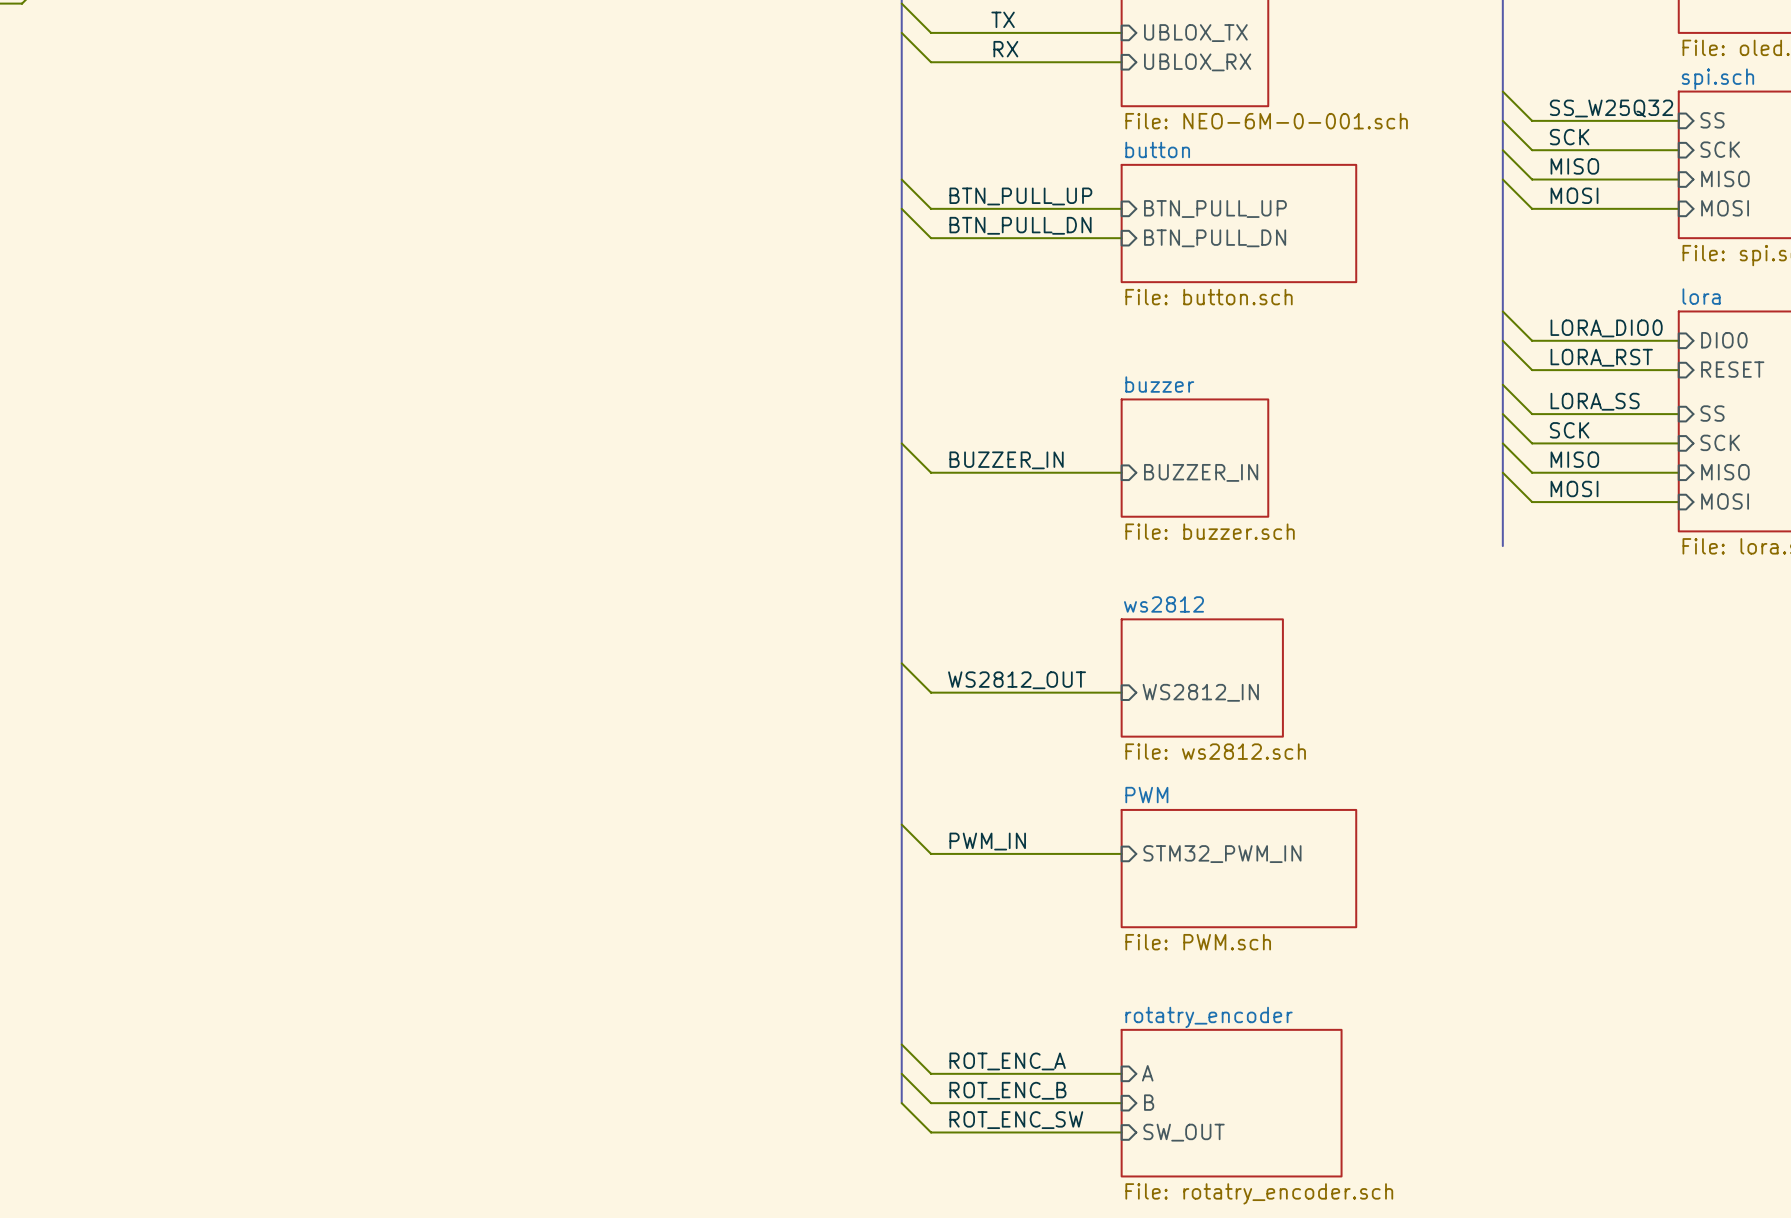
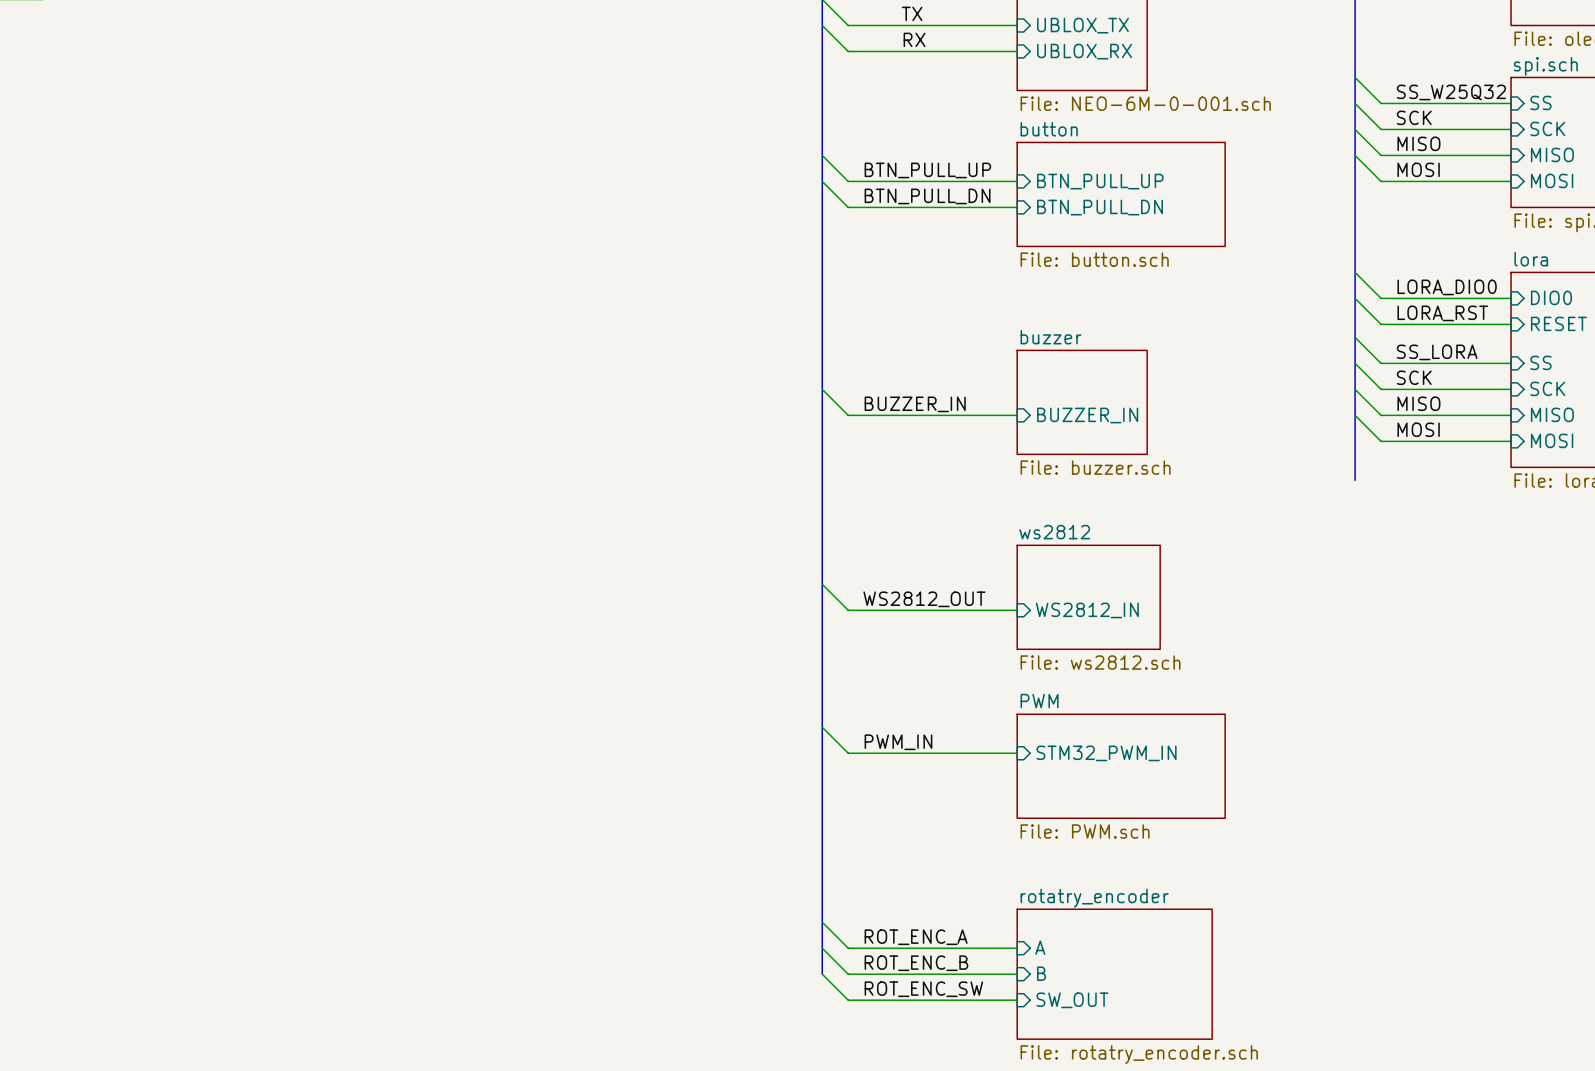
label: LORA_SS (1595, 401) -> SS_LORA (1437, 352)

